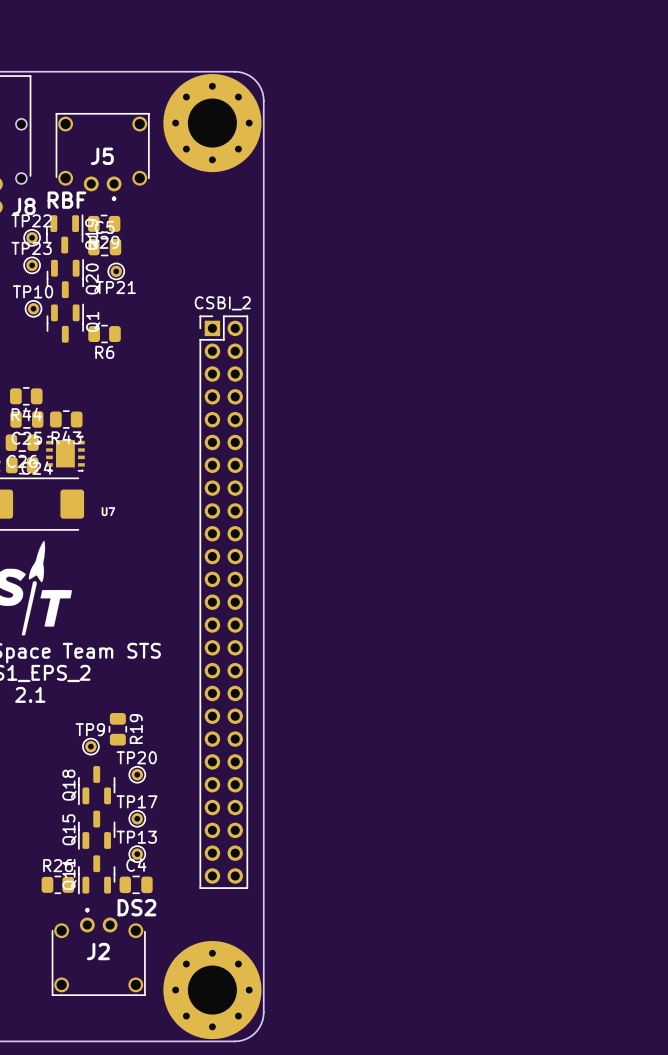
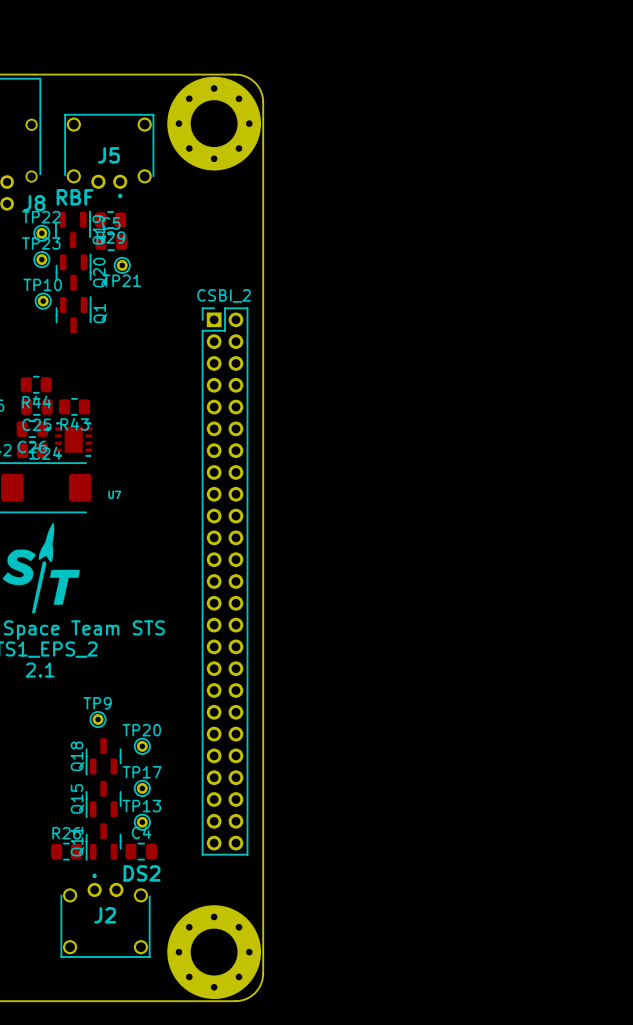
R6: (104, 334) -> none
R19: (117, 729) -> none

